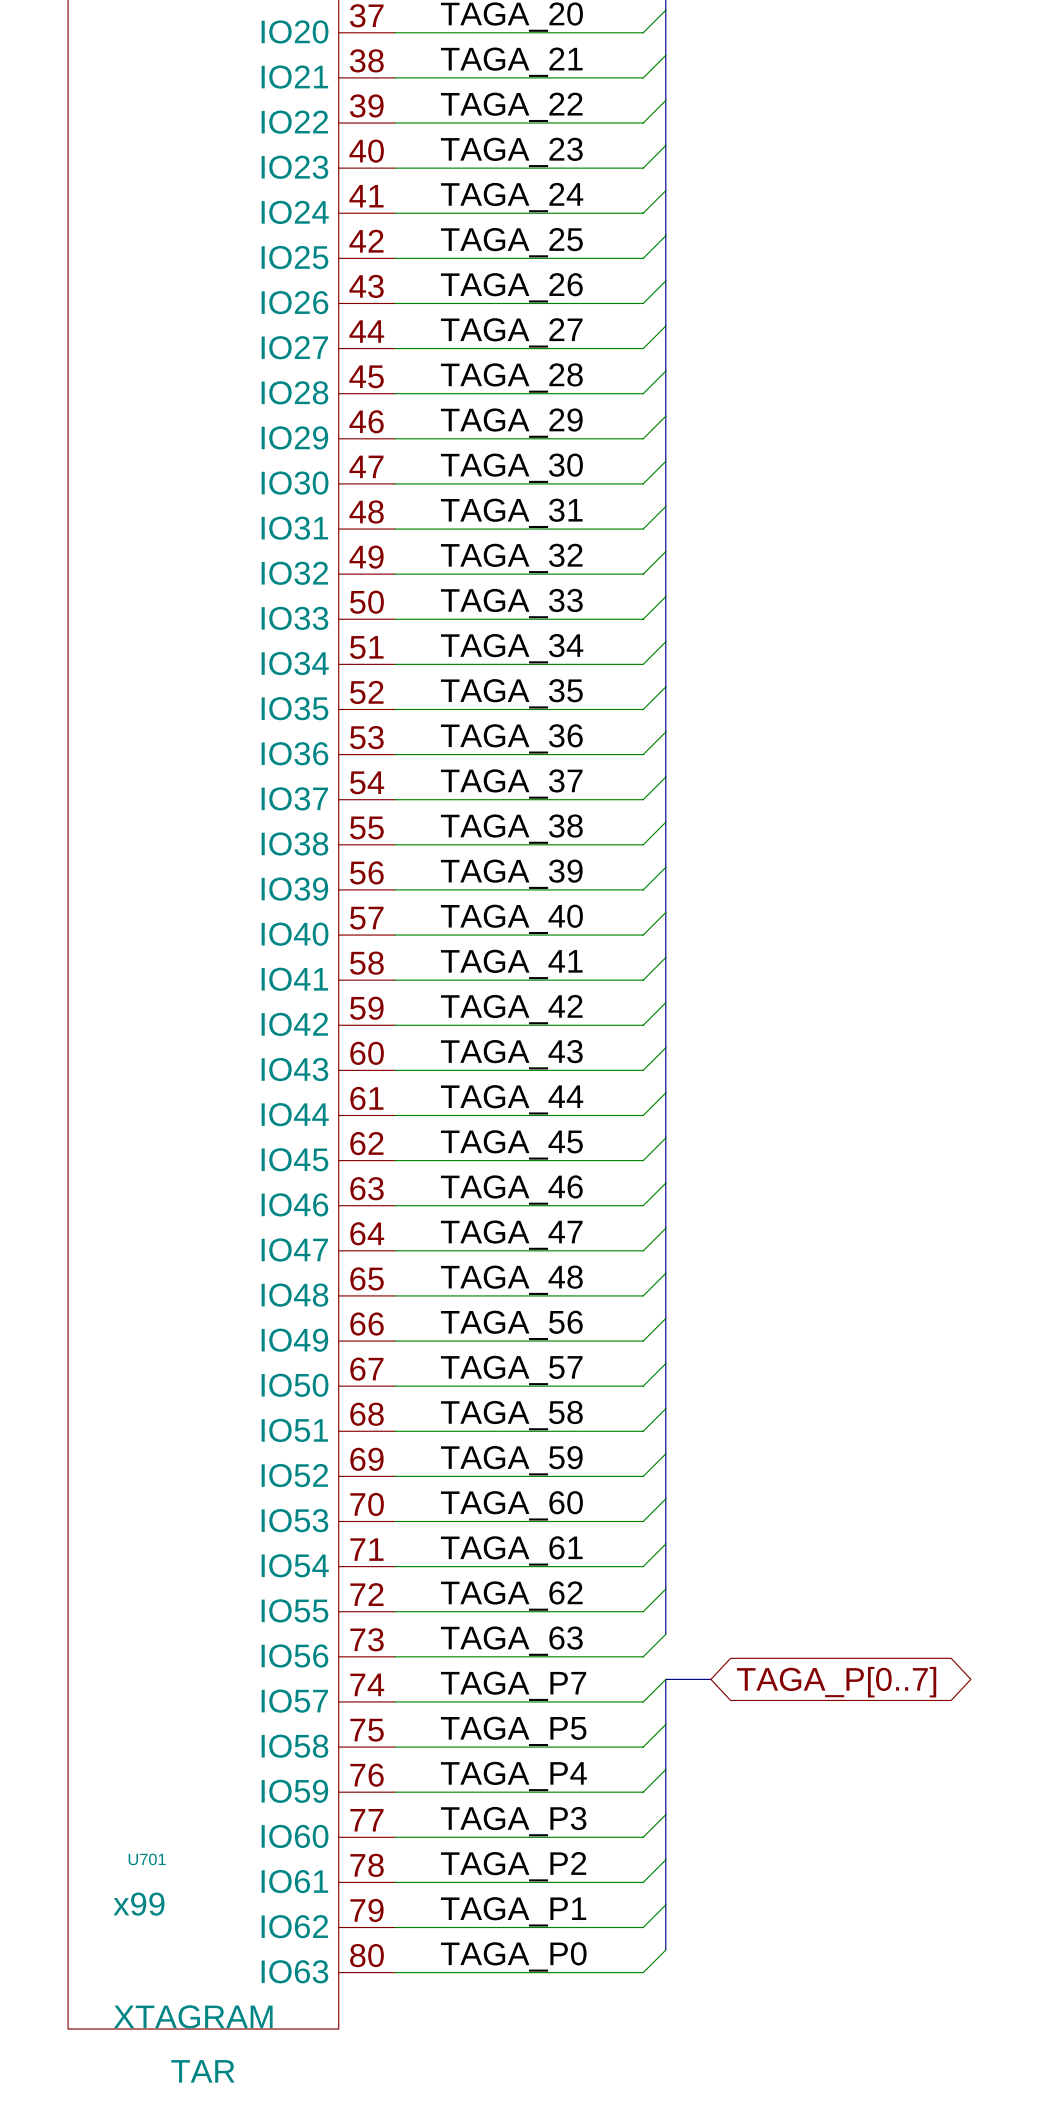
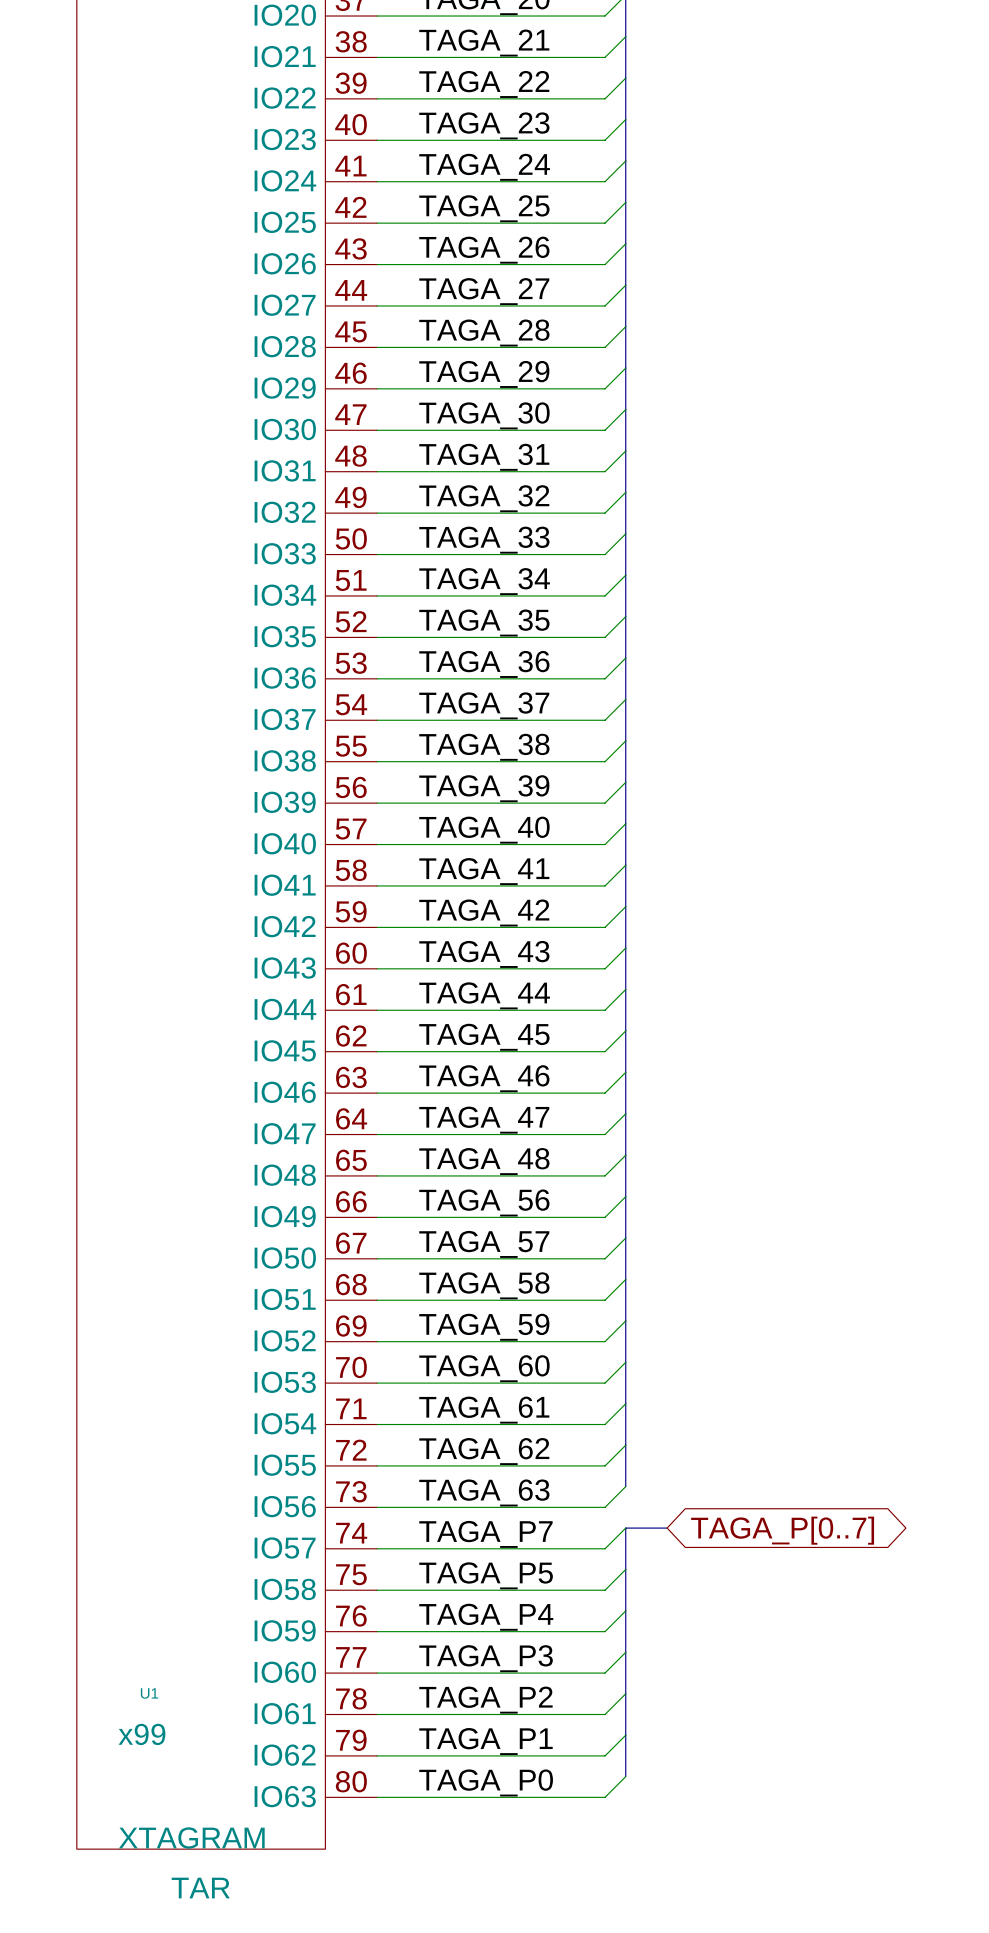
U701 name: U701 (147, 1859) -> U1 (149, 1693)

